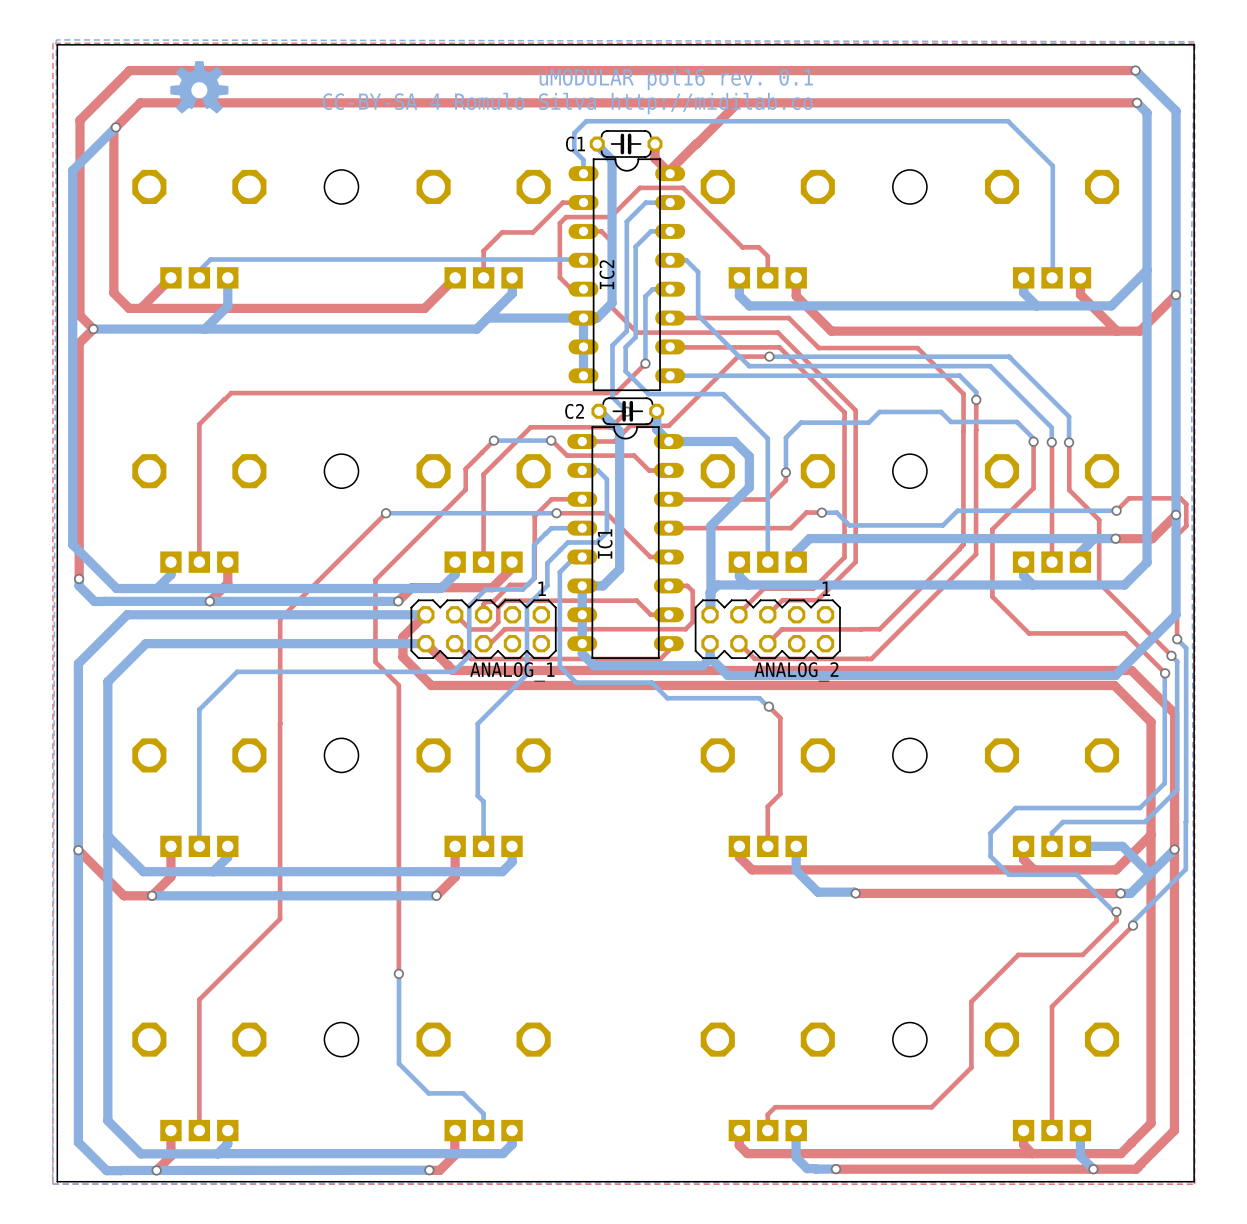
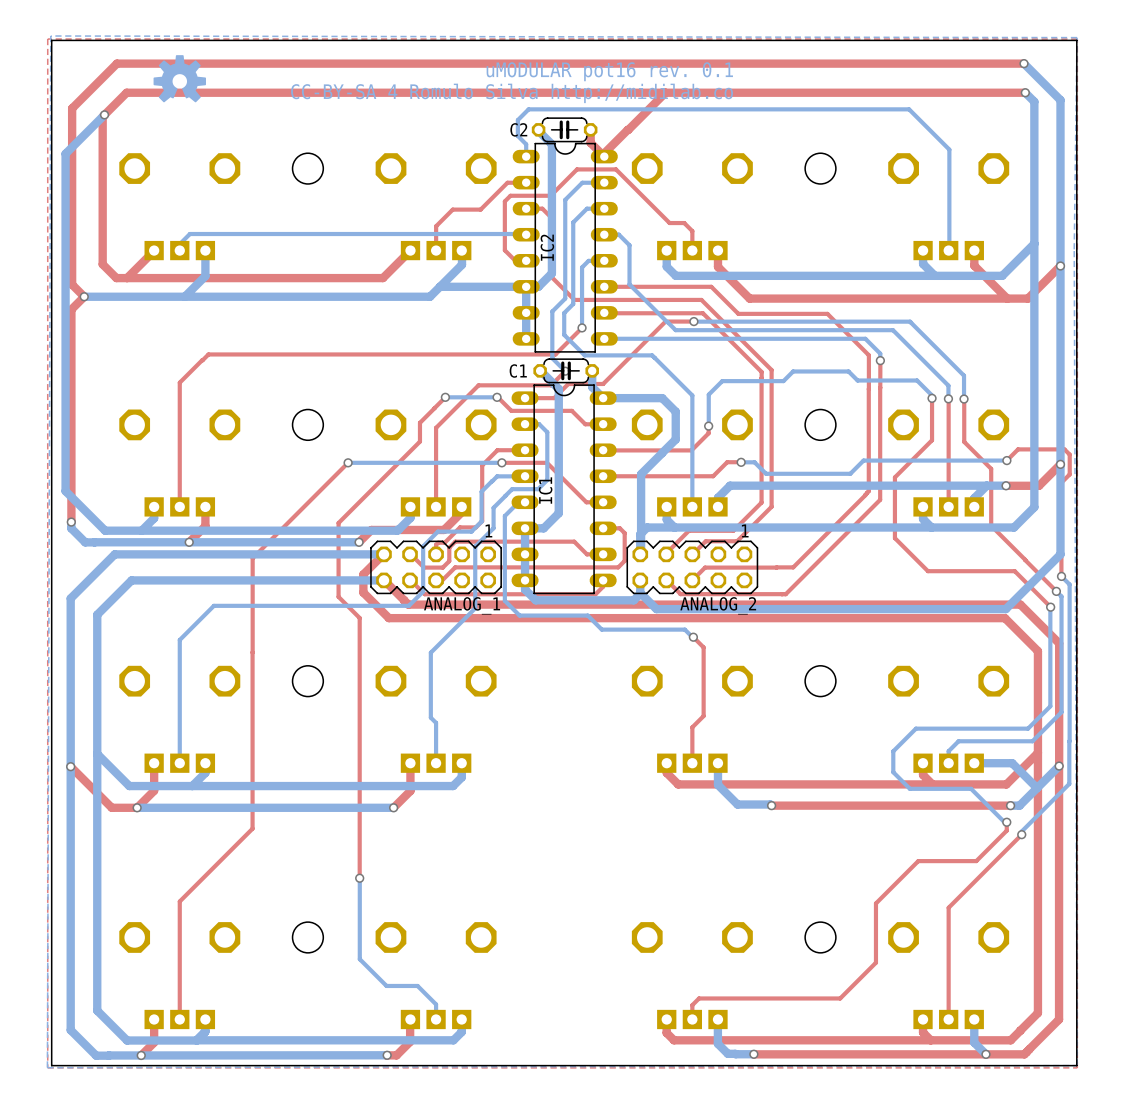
C1 name: C1 (575, 144) -> C2 (518, 129)
C2 name: C2 (574, 411) -> C1 (518, 371)

